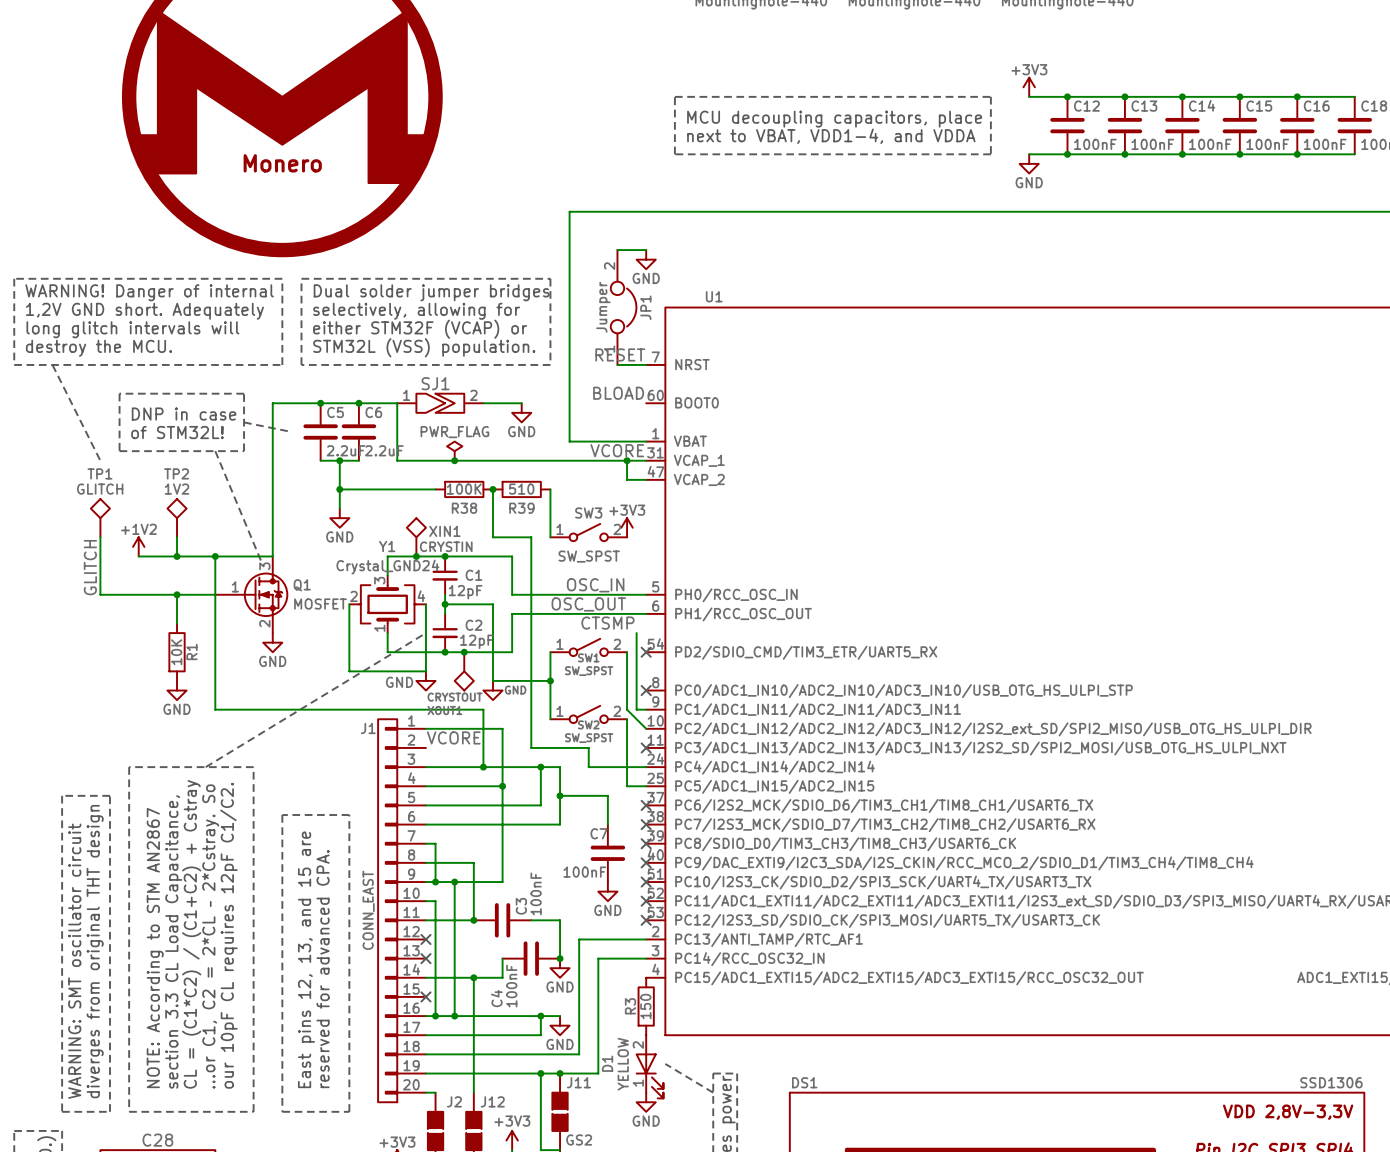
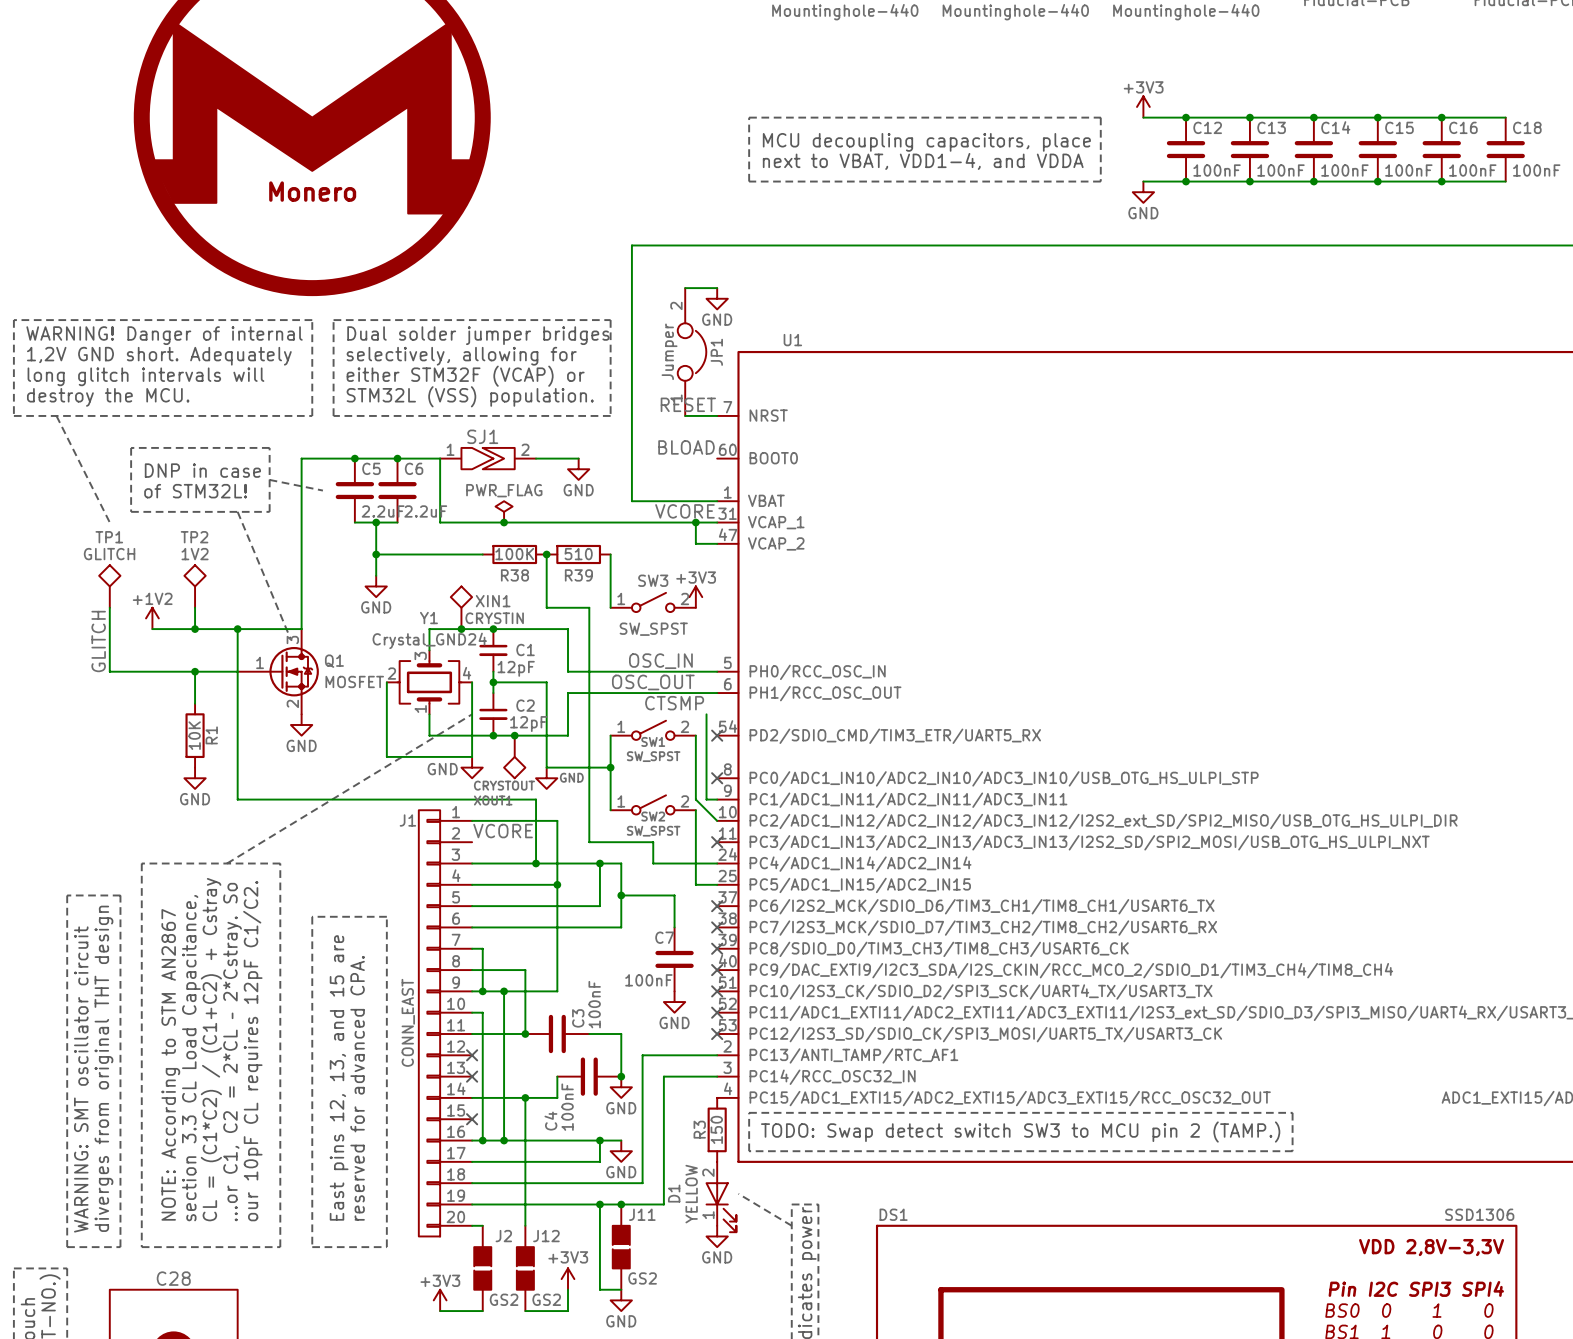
line: none -> (749, 1112) (1292, 1112) (1292, 1151) (749, 1151) (749, 1112)
text: none -> TODO: Swap detect switch SW3 to MCU pin 2 (TAMP.) (1020, 1132)

